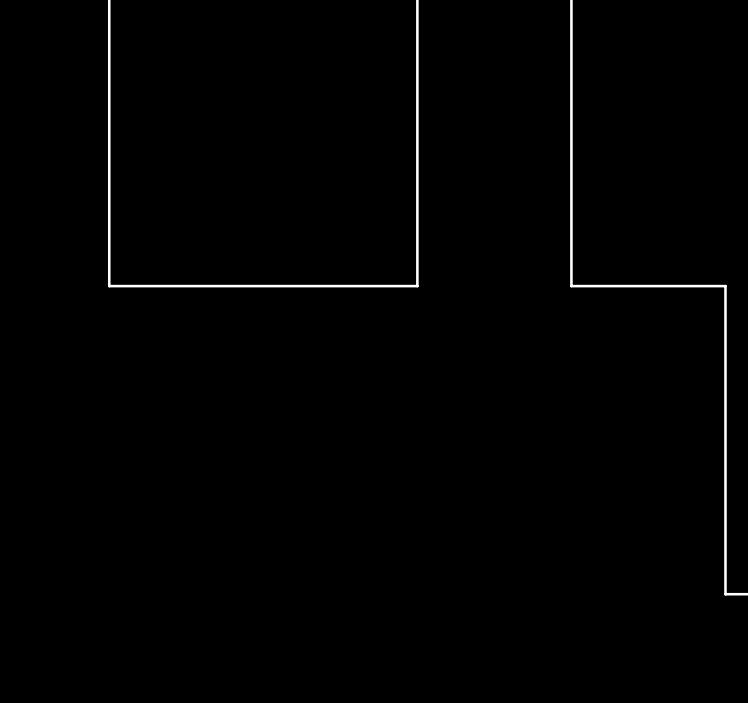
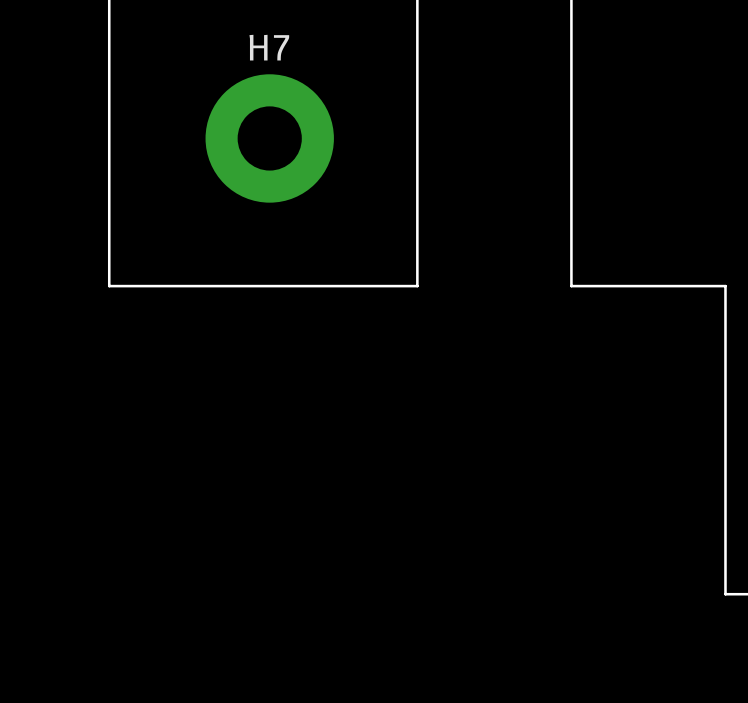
H7: none -> (269, 138)

